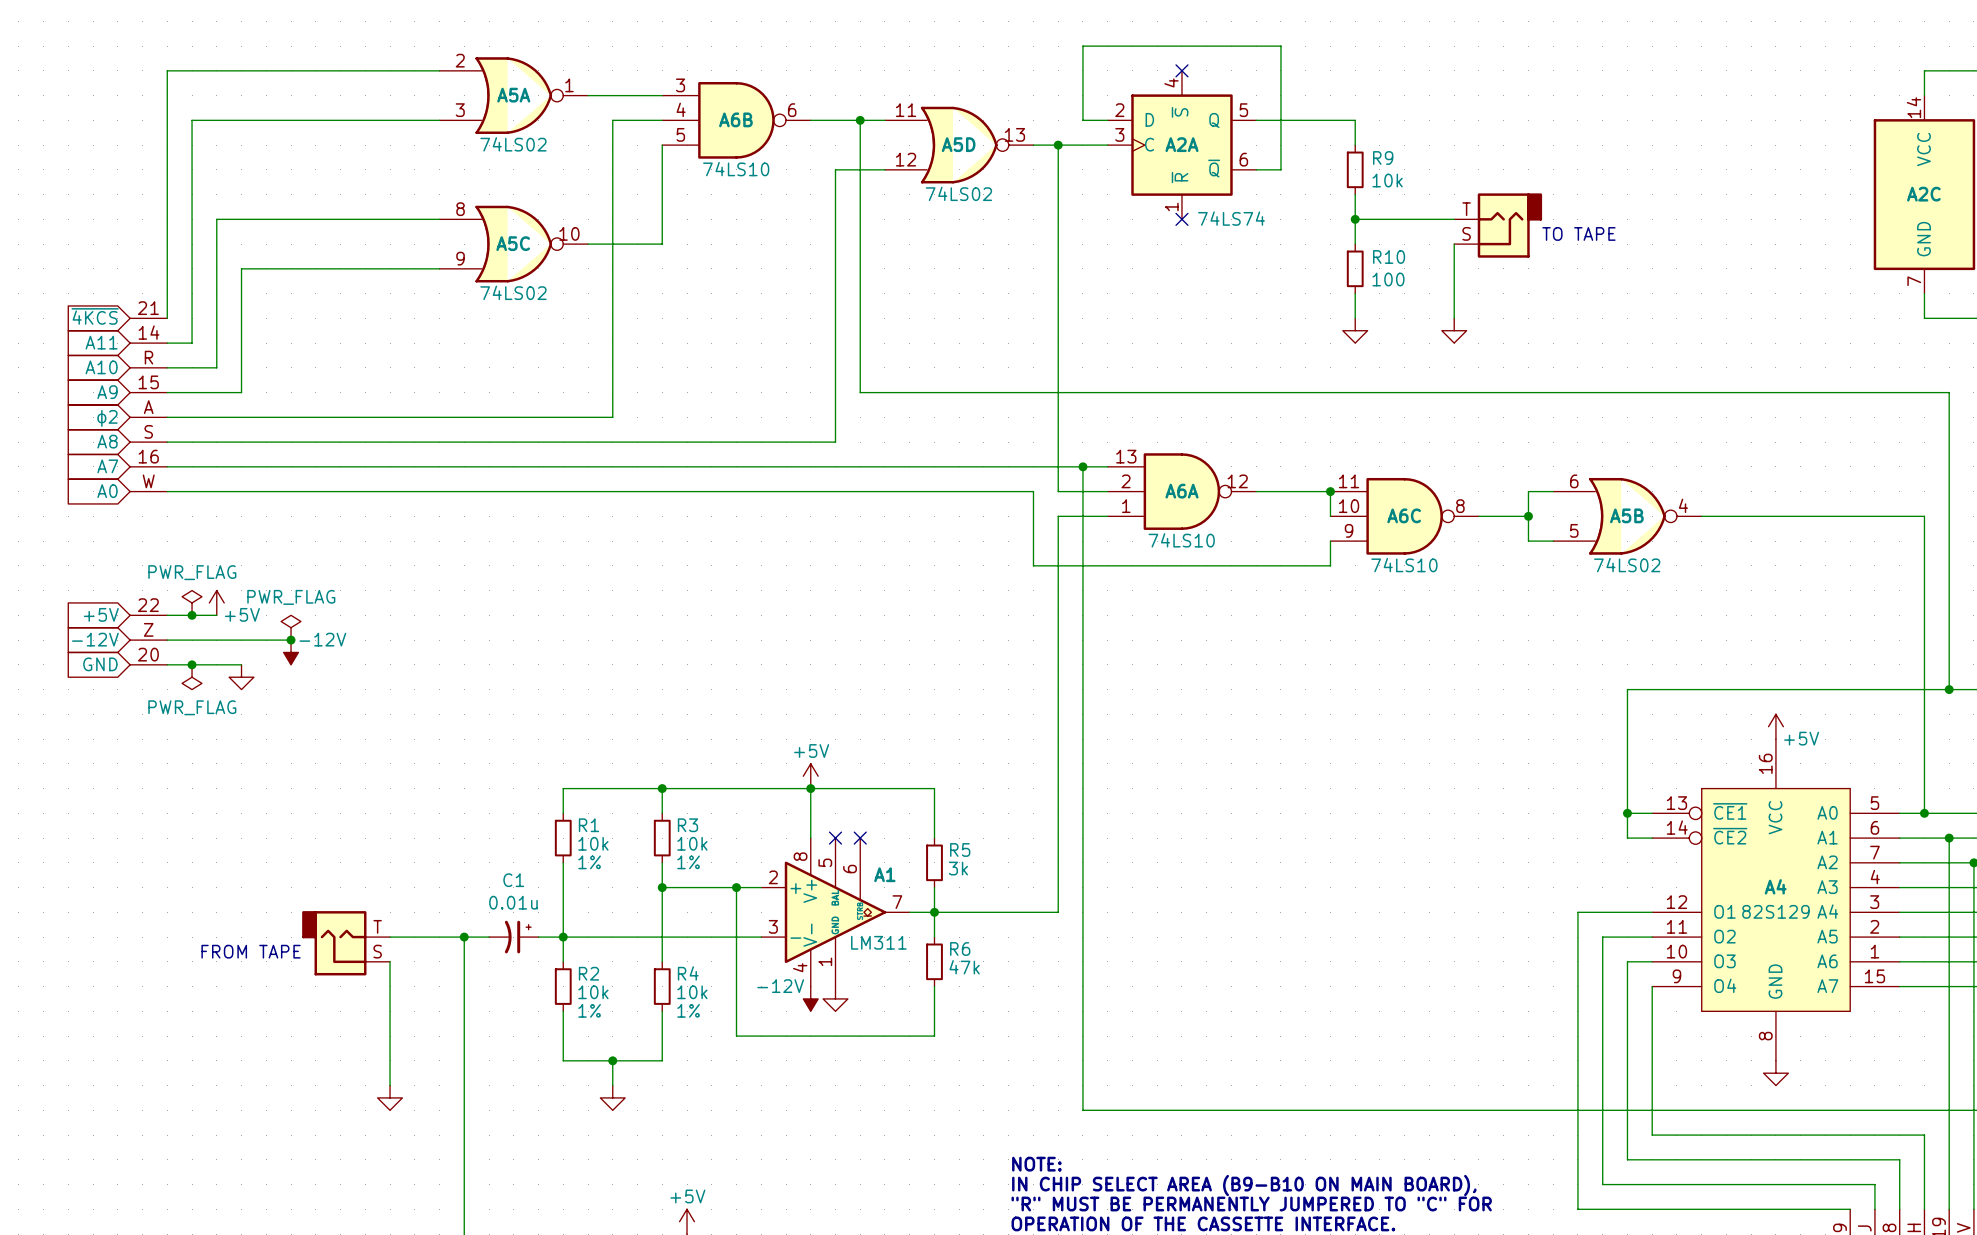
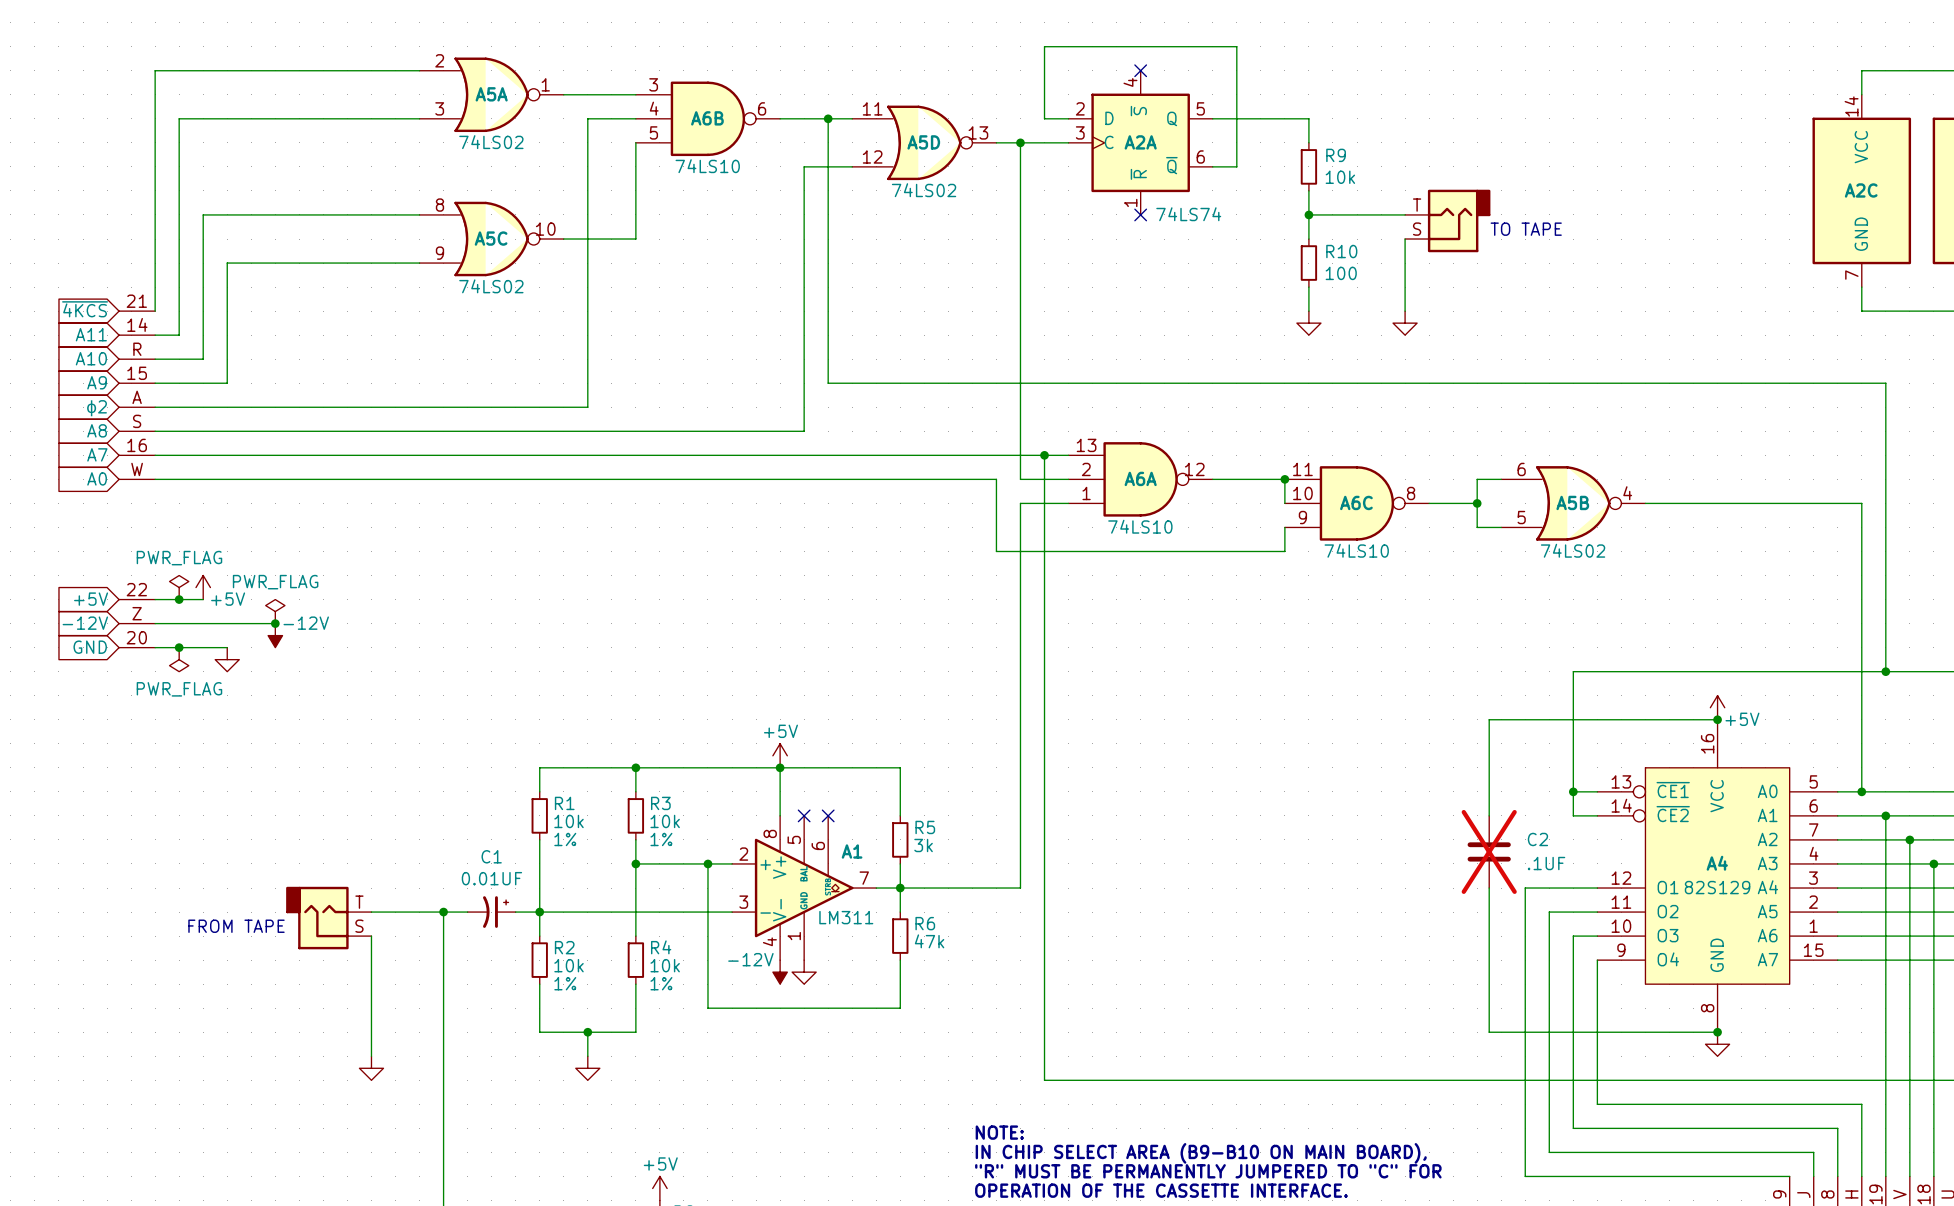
wire: none -> (1717, 719) (1489, 719) (1489, 815)
junction: none -> (1717, 719)
C2: none -> .1UF (1489, 851)
C1 value: 0.01u (513, 902) -> 0.01UF (491, 878)
wire: none -> (1489, 888) (1489, 1032) (1717, 1032)
junction: none -> (1717, 1032)

